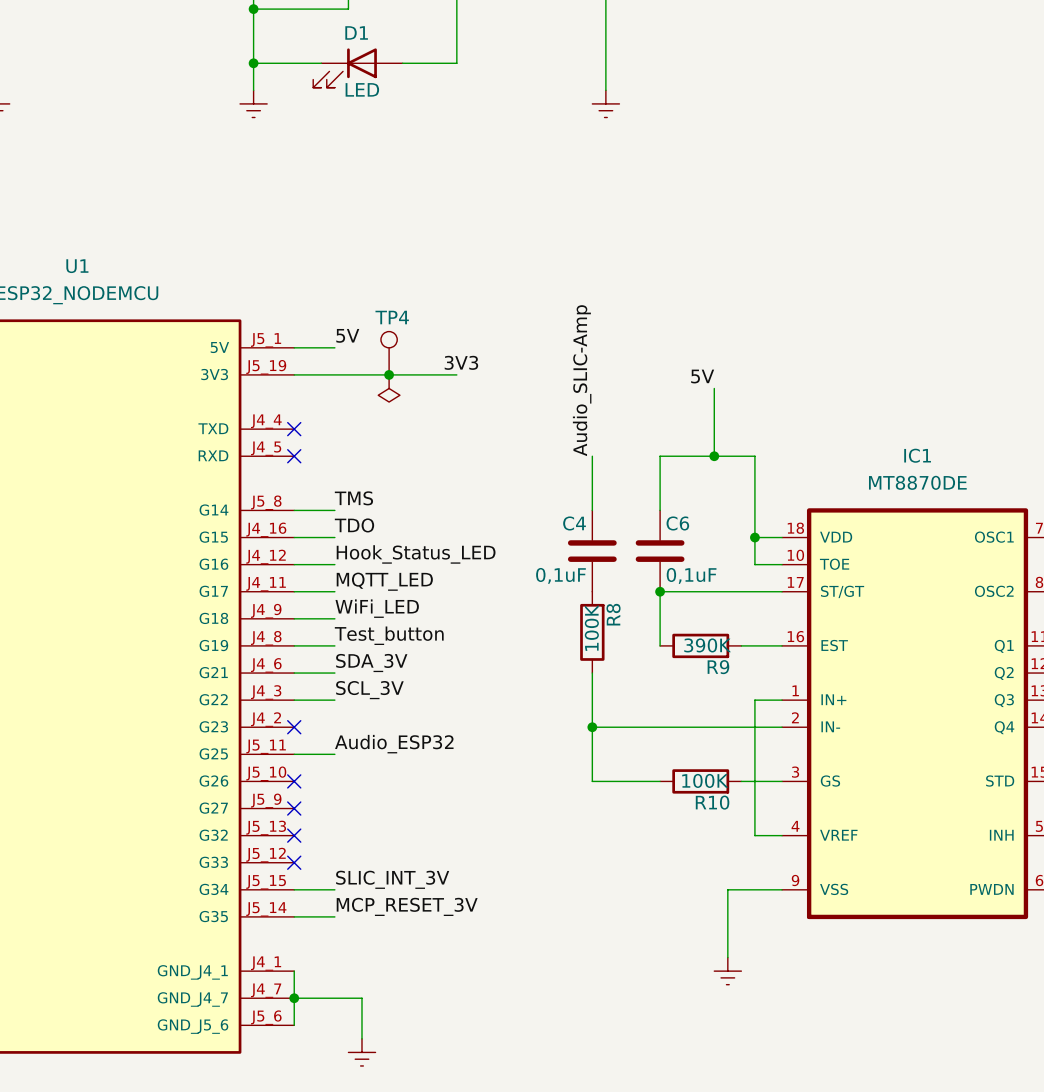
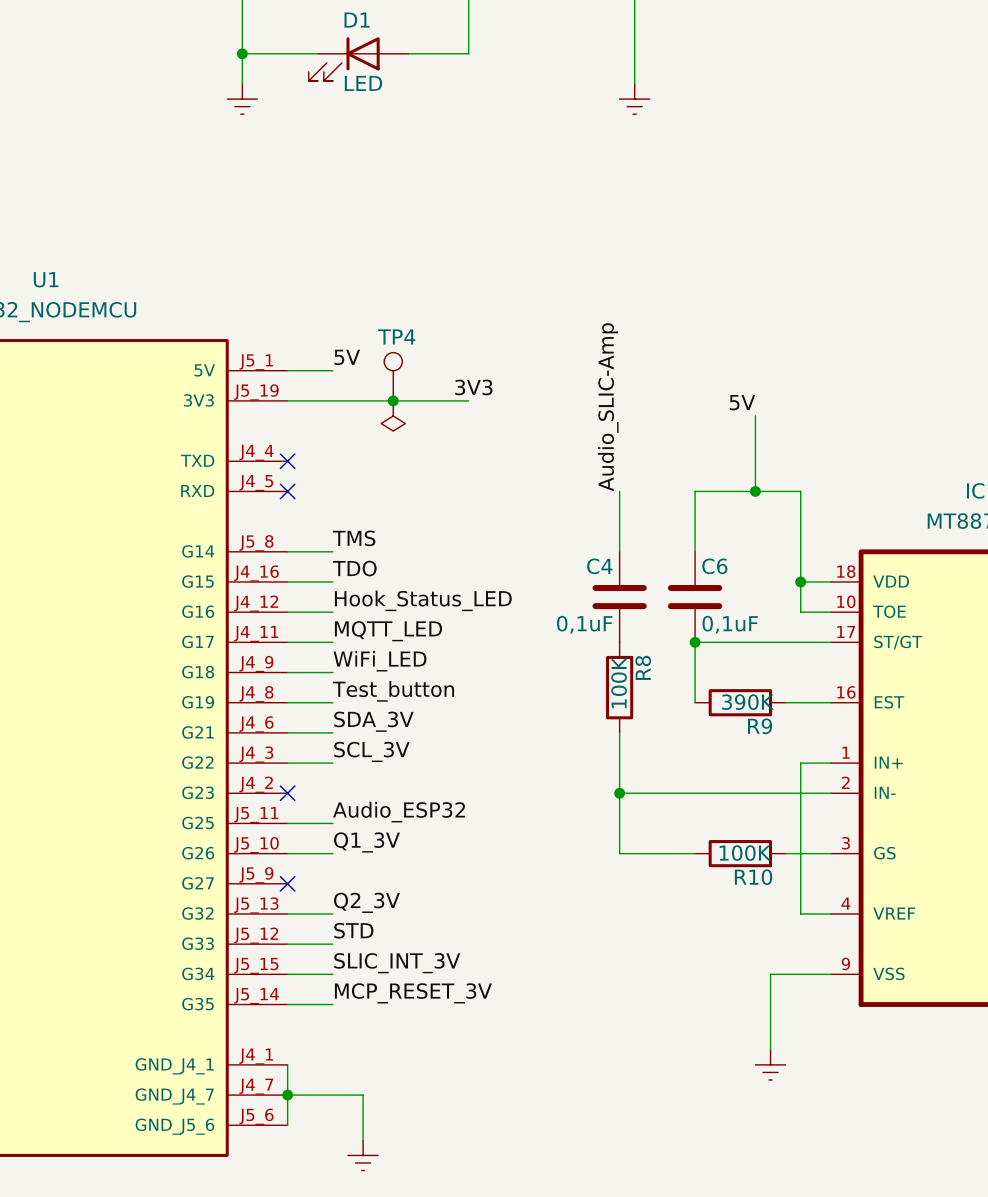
label: none -> Q1_3V (366, 842)
wire: none -> (287, 853) (332, 853)
no-connect mark: (294, 781) -> none
label: none -> Q2_3V (366, 902)
wire: none -> (287, 913) (332, 913)
no-connect mark: (294, 835) -> none
label: none -> STD (353, 930)
wire: none -> (287, 944) (332, 944)
no-connect mark: (294, 862) -> none

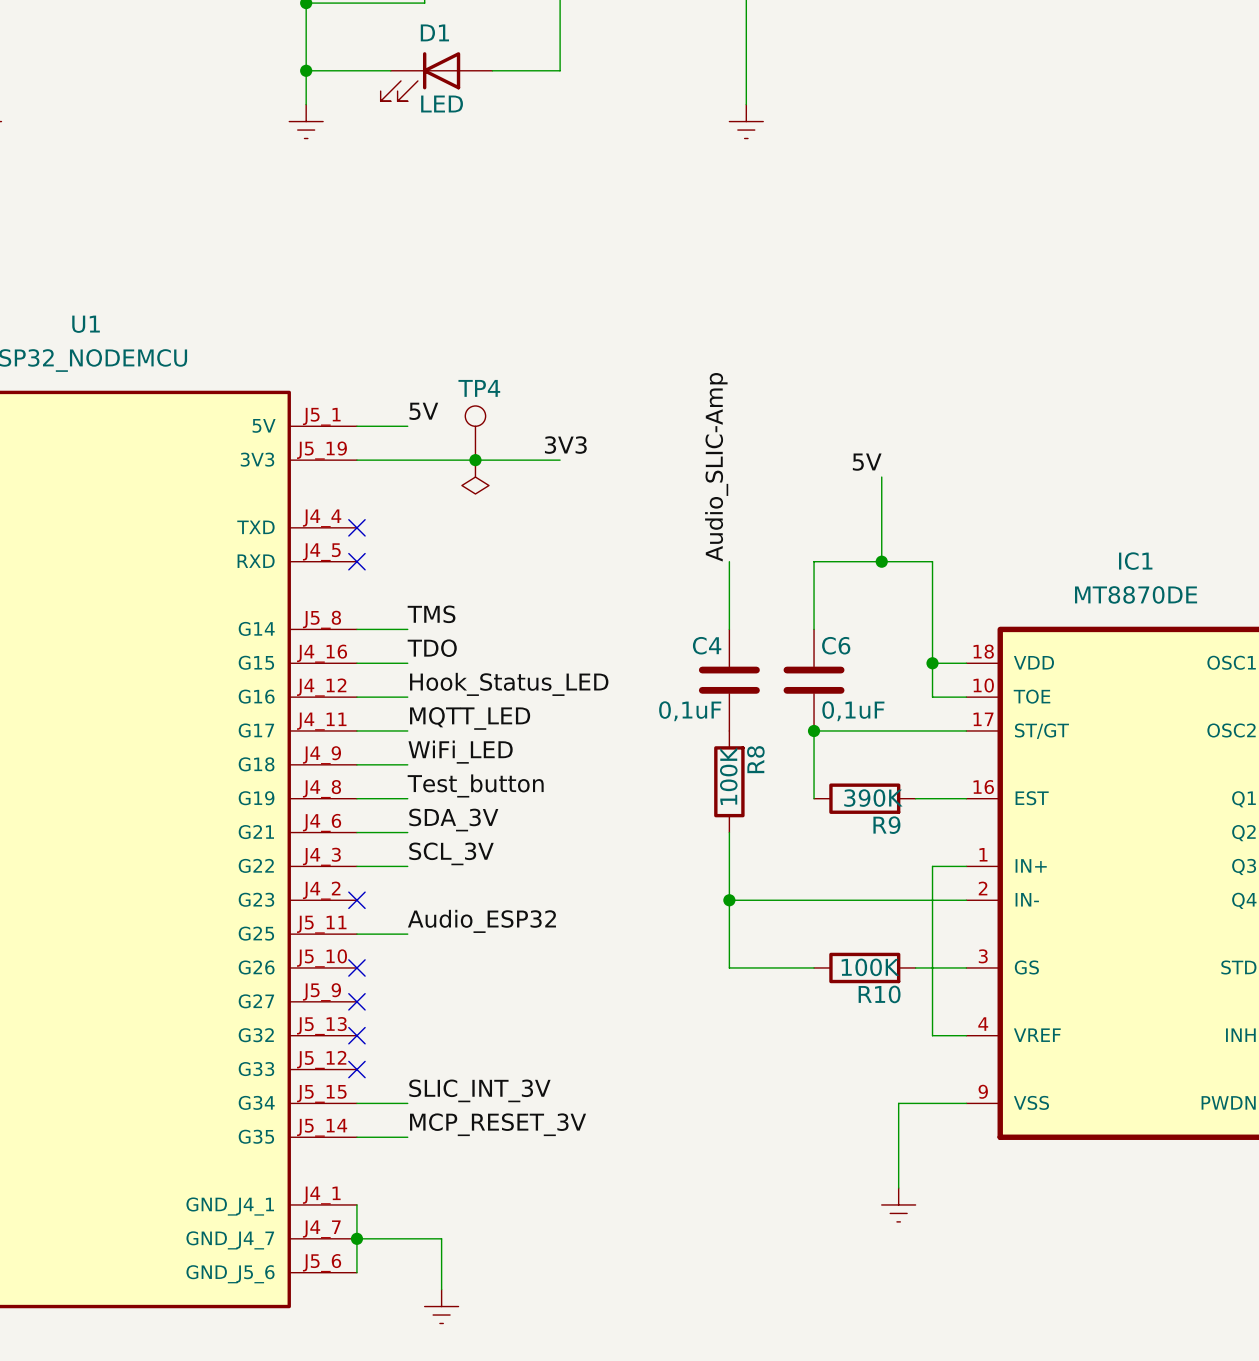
label: Q1_3V (366, 842) -> none
wire: (287, 853) (332, 853) -> none
no-connect mark: none -> (356, 967)
label: Q2_3V (366, 902) -> none
wire: (287, 913) (332, 913) -> none
no-connect mark: none -> (356, 1035)
label: STD (353, 930) -> none
wire: (287, 944) (332, 944) -> none
no-connect mark: none -> (356, 1069)

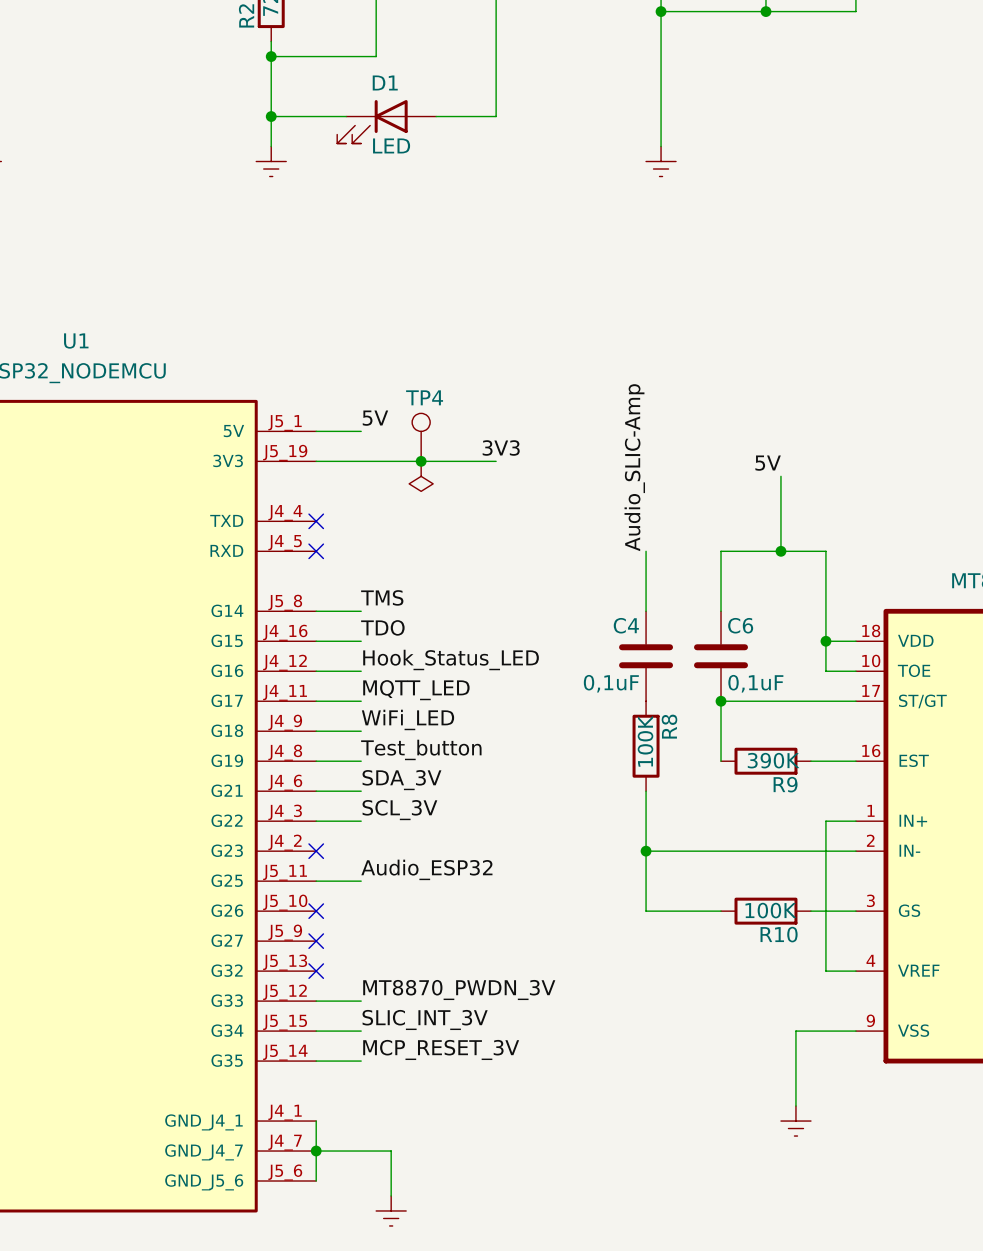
label: none -> MT8870_PWDN_3V (459, 990)
wire: none -> (316, 1001) (361, 1001)
no-connect mark: (356, 1069) -> none

